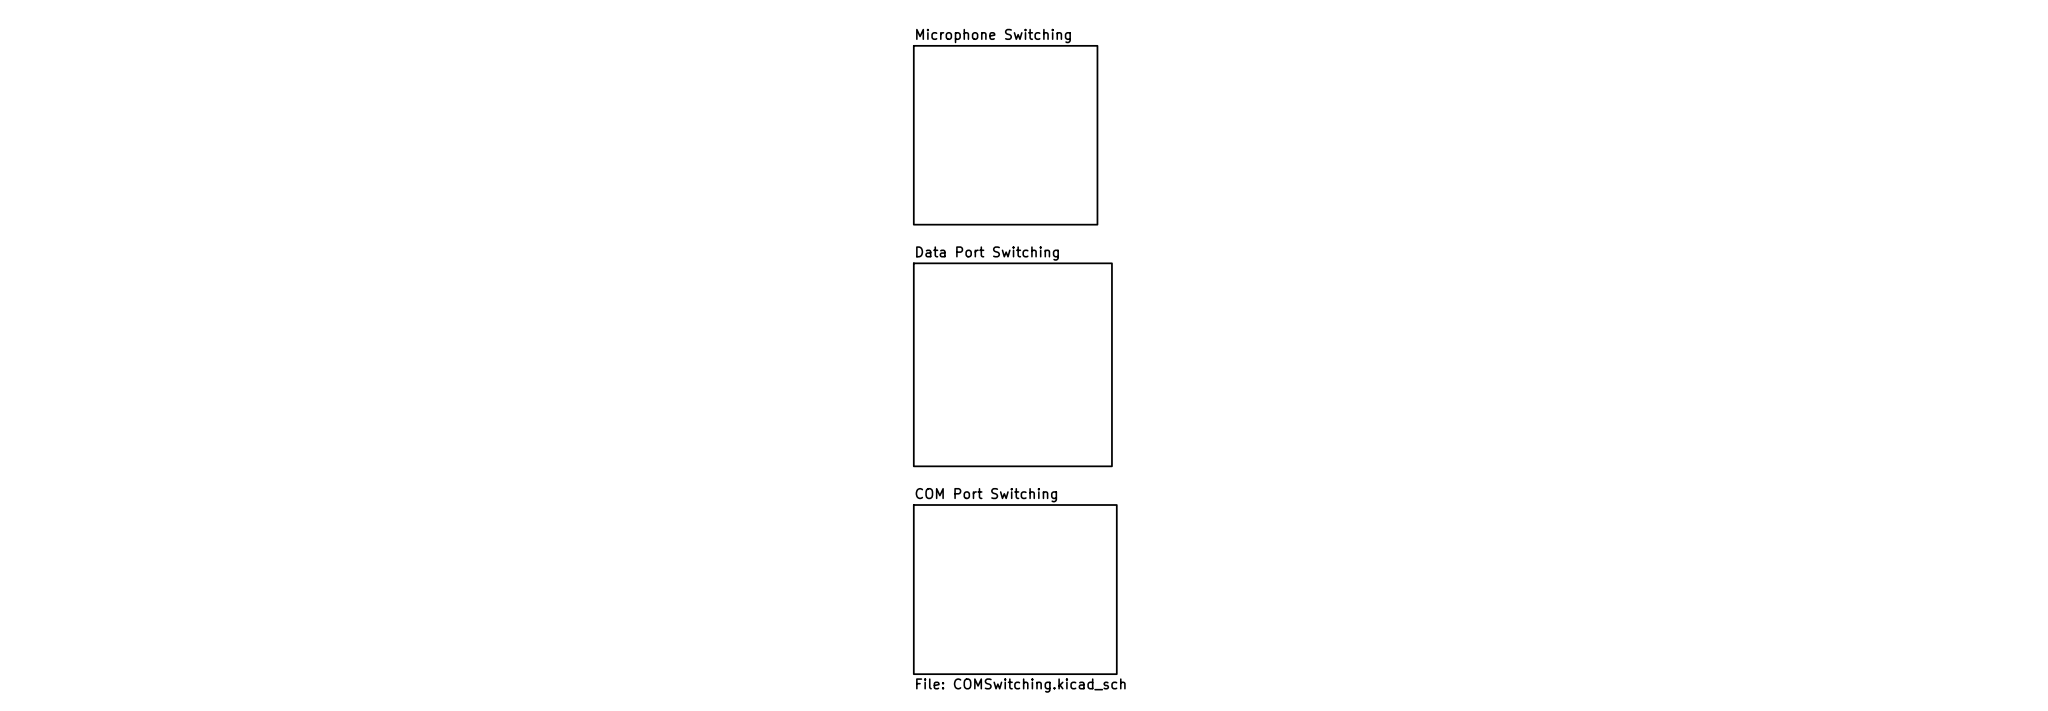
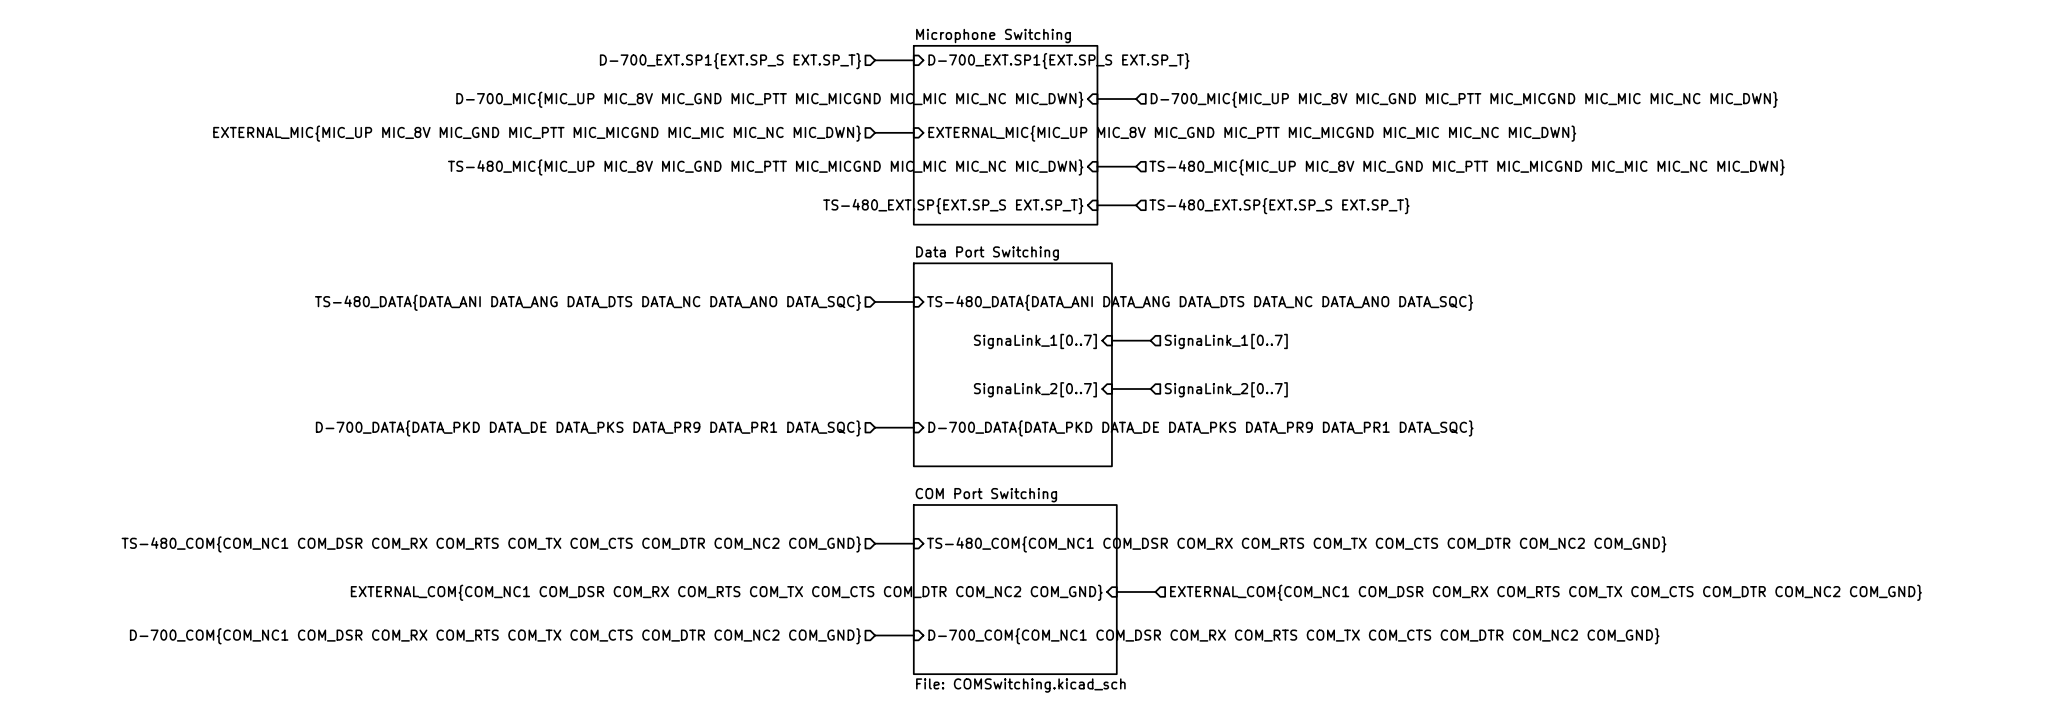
bus: none -> (875, 60) (913, 60)
hierarchical label: none -> D-700_EXT.SP1{EXT.SP_S EXT.SP_T} (730, 61)
sheet pin: none -> D-700_EXT.SP1{EXT.SP_S EXT.SP_T} (1058, 61)
sheet pin: none -> D-700_MIC{MIC_UP MIC_8V MIC_GND MIC_PTT MIC_MICGND MIC_MIC MIC_NC MIC_DWN} (769, 99)
bus: none -> (1097, 99) (1136, 99)
hierarchical label: none -> D-700_MIC{MIC_UP MIC_8V MIC_GND MIC_PTT MIC_MICGND MIC_MIC MIC_NC MIC_DWN} (1464, 99)
bus: none -> (875, 132) (913, 132)
hierarchical label: none -> EXTERNAL_MIC{MIC_UP MIC_8V MIC_GND MIC_PTT MIC_MICGND MIC_MIC MIC_NC MIC_DWN} (537, 133)
sheet pin: none -> EXTERNAL_MIC{MIC_UP MIC_8V MIC_GND MIC_PTT MIC_MICGND MIC_MIC MIC_NC MIC_DWN} (1252, 133)
bus: none -> (1097, 166) (1136, 166)
sheet pin: none -> TS-480_MIC{MIC_UP MIC_8V MIC_GND MIC_PTT MIC_MICGND MIC_MIC MIC_NC MIC_DWN} (765, 167)
hierarchical label: none -> TS-480_MIC{MIC_UP MIC_8V MIC_GND MIC_PTT MIC_MICGND MIC_MIC MIC_NC MIC_DWN} (1467, 167)
bus: none -> (1097, 205) (1136, 205)
sheet pin: none -> TS-480_EXT.SP{EXT.SP_S EXT.SP_T} (953, 206)
hierarchical label: none -> TS-480_EXT.SP{EXT.SP_S EXT.SP_T} (1279, 206)
hierarchical label: none -> TS-480_DATA{DATA_ANI DATA_ANG DATA_DTS DATA_NC DATA_ANO DATA_SQC} (587, 302)
bus: none -> (875, 302) (913, 302)
sheet pin: none -> TS-480_DATA{DATA_ANI DATA_ANG DATA_DTS DATA_NC DATA_ANO DATA_SQC} (1200, 302)
bus: none -> (1111, 340) (1150, 340)
sheet pin: none -> SignaLink_1[0..7] (1035, 341)
hierarchical label: none -> SignaLink_1[0..7] (1226, 341)
sheet pin: none -> SignaLink_2[0..7] (1035, 389)
bus: none -> (1111, 389) (1150, 389)
hierarchical label: none -> SignaLink_2[0..7] (1226, 389)
bus: none -> (875, 427) (913, 427)
hierarchical label: none -> D-700_DATA{DATA_PKD DATA_DE DATA_PKS DATA_PR9 DATA_PR1 DATA_SQC} (588, 428)
sheet pin: none -> D-700_DATA{DATA_PKD DATA_DE DATA_PKS DATA_PR9 DATA_PR1 DATA_SQC} (1200, 428)
bus: none -> (875, 543) (913, 543)
hierarchical label: none -> TS-480_COM{COM_NC1 COM_DSR COM_RX COM_RTS COM_TX COM_CTS COM_DTR COM_NC2 COM_GND} (491, 544)
sheet pin: none -> TS-480_COM{COM_NC1 COM_DSR COM_RX COM_RTS COM_TX COM_CTS COM_DTR COM_NC2 COM_GND} (1296, 544)
sheet pin: none -> EXTERNAL_COM{COM_NC1 COM_DSR COM_RX COM_RTS COM_TX COM_CTS COM_DTR COM_NC2 COM_GND} (726, 592)
bus: none -> (1116, 592) (1155, 592)
hierarchical label: none -> EXTERNAL_COM{COM_NC1 COM_DSR COM_RX COM_RTS COM_TX COM_CTS COM_DTR COM_NC2 COM_GND} (1545, 592)
bus: none -> (875, 635) (913, 635)
hierarchical label: none -> D-700_COM{COM_NC1 COM_DSR COM_RX COM_RTS COM_TX COM_CTS COM_DTR COM_NC2 COM_GND} (495, 636)
sheet pin: none -> D-700_COM{COM_NC1 COM_DSR COM_RX COM_RTS COM_TX COM_CTS COM_DTR COM_NC2 COM_GND} (1293, 636)

